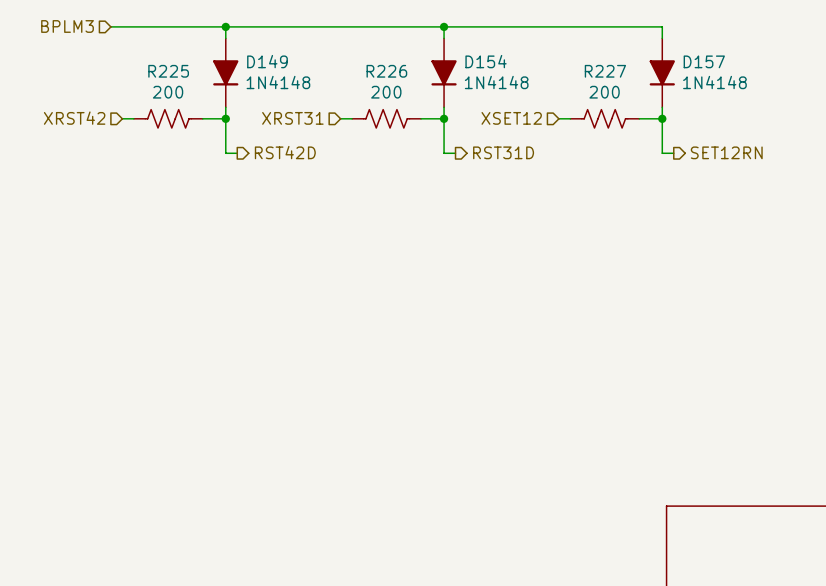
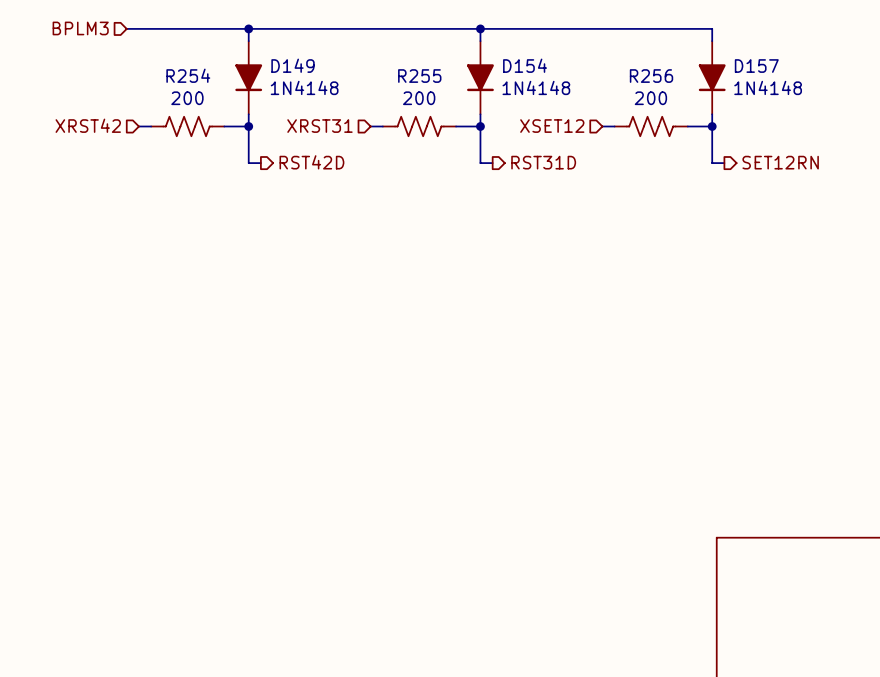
R225 name: R225 (168, 71) -> R254 (188, 75)
R226 name: R226 (386, 71) -> R255 (419, 76)
R227 name: R227 (605, 71) -> R256 (651, 76)

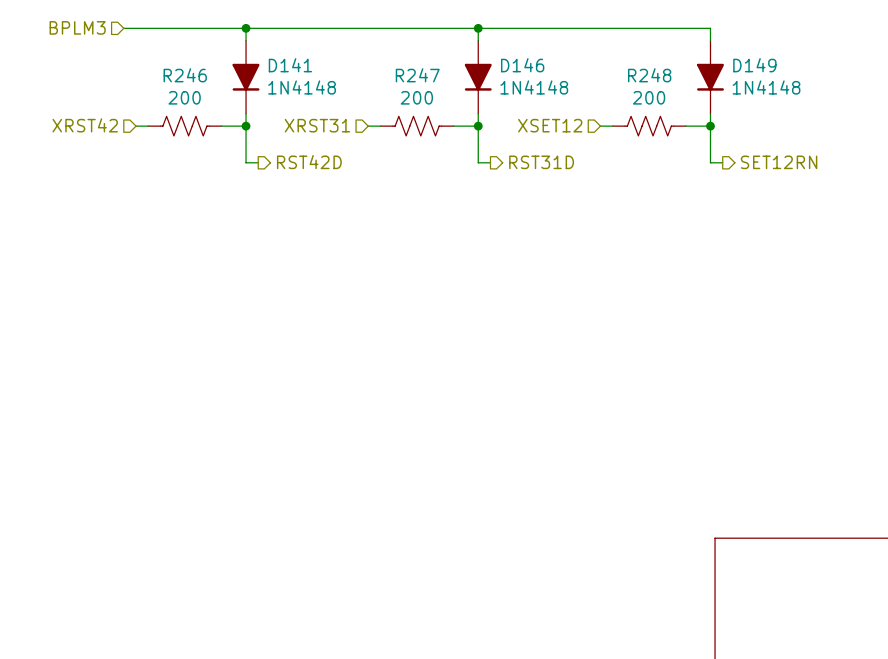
D149 name: D149 (293, 65) -> D141 (290, 65)
D154 name: D154 (525, 65) -> D146 (522, 65)
D157 name: D157 (756, 66) -> D149 (754, 65)
R254 name: R254 (188, 75) -> R246 (185, 75)
R255 name: R255 (419, 76) -> R247 (417, 75)
R256 name: R256 (651, 76) -> R248 (649, 75)

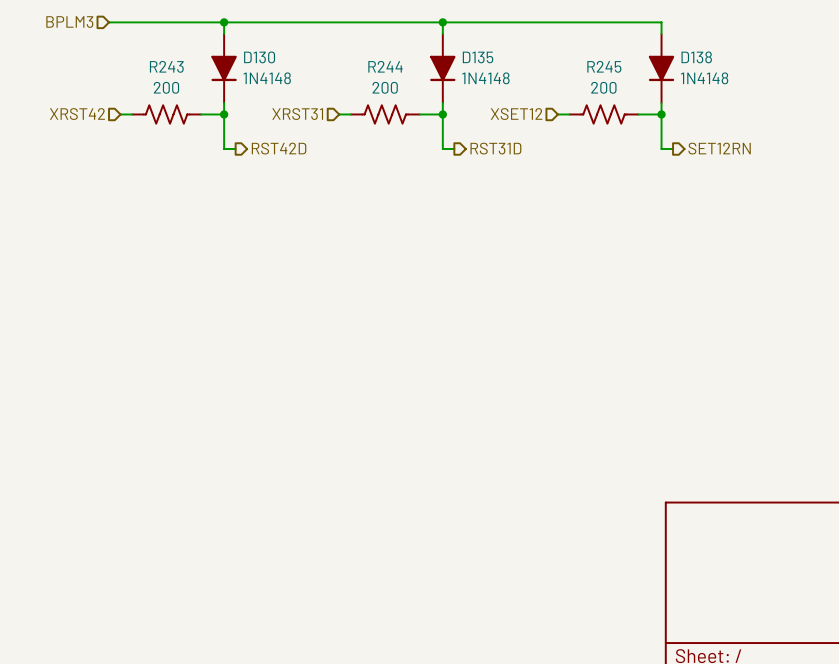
D141 name: D141 (290, 65) -> D130 (259, 57)
D146 name: D146 (522, 65) -> D135 (478, 57)
D149 name: D149 (754, 65) -> D138 (696, 57)
R246 name: R246 (185, 75) -> R243 (166, 66)
R247 name: R247 (417, 75) -> R244 (385, 66)
R248 name: R248 (649, 75) -> R245 (604, 66)

